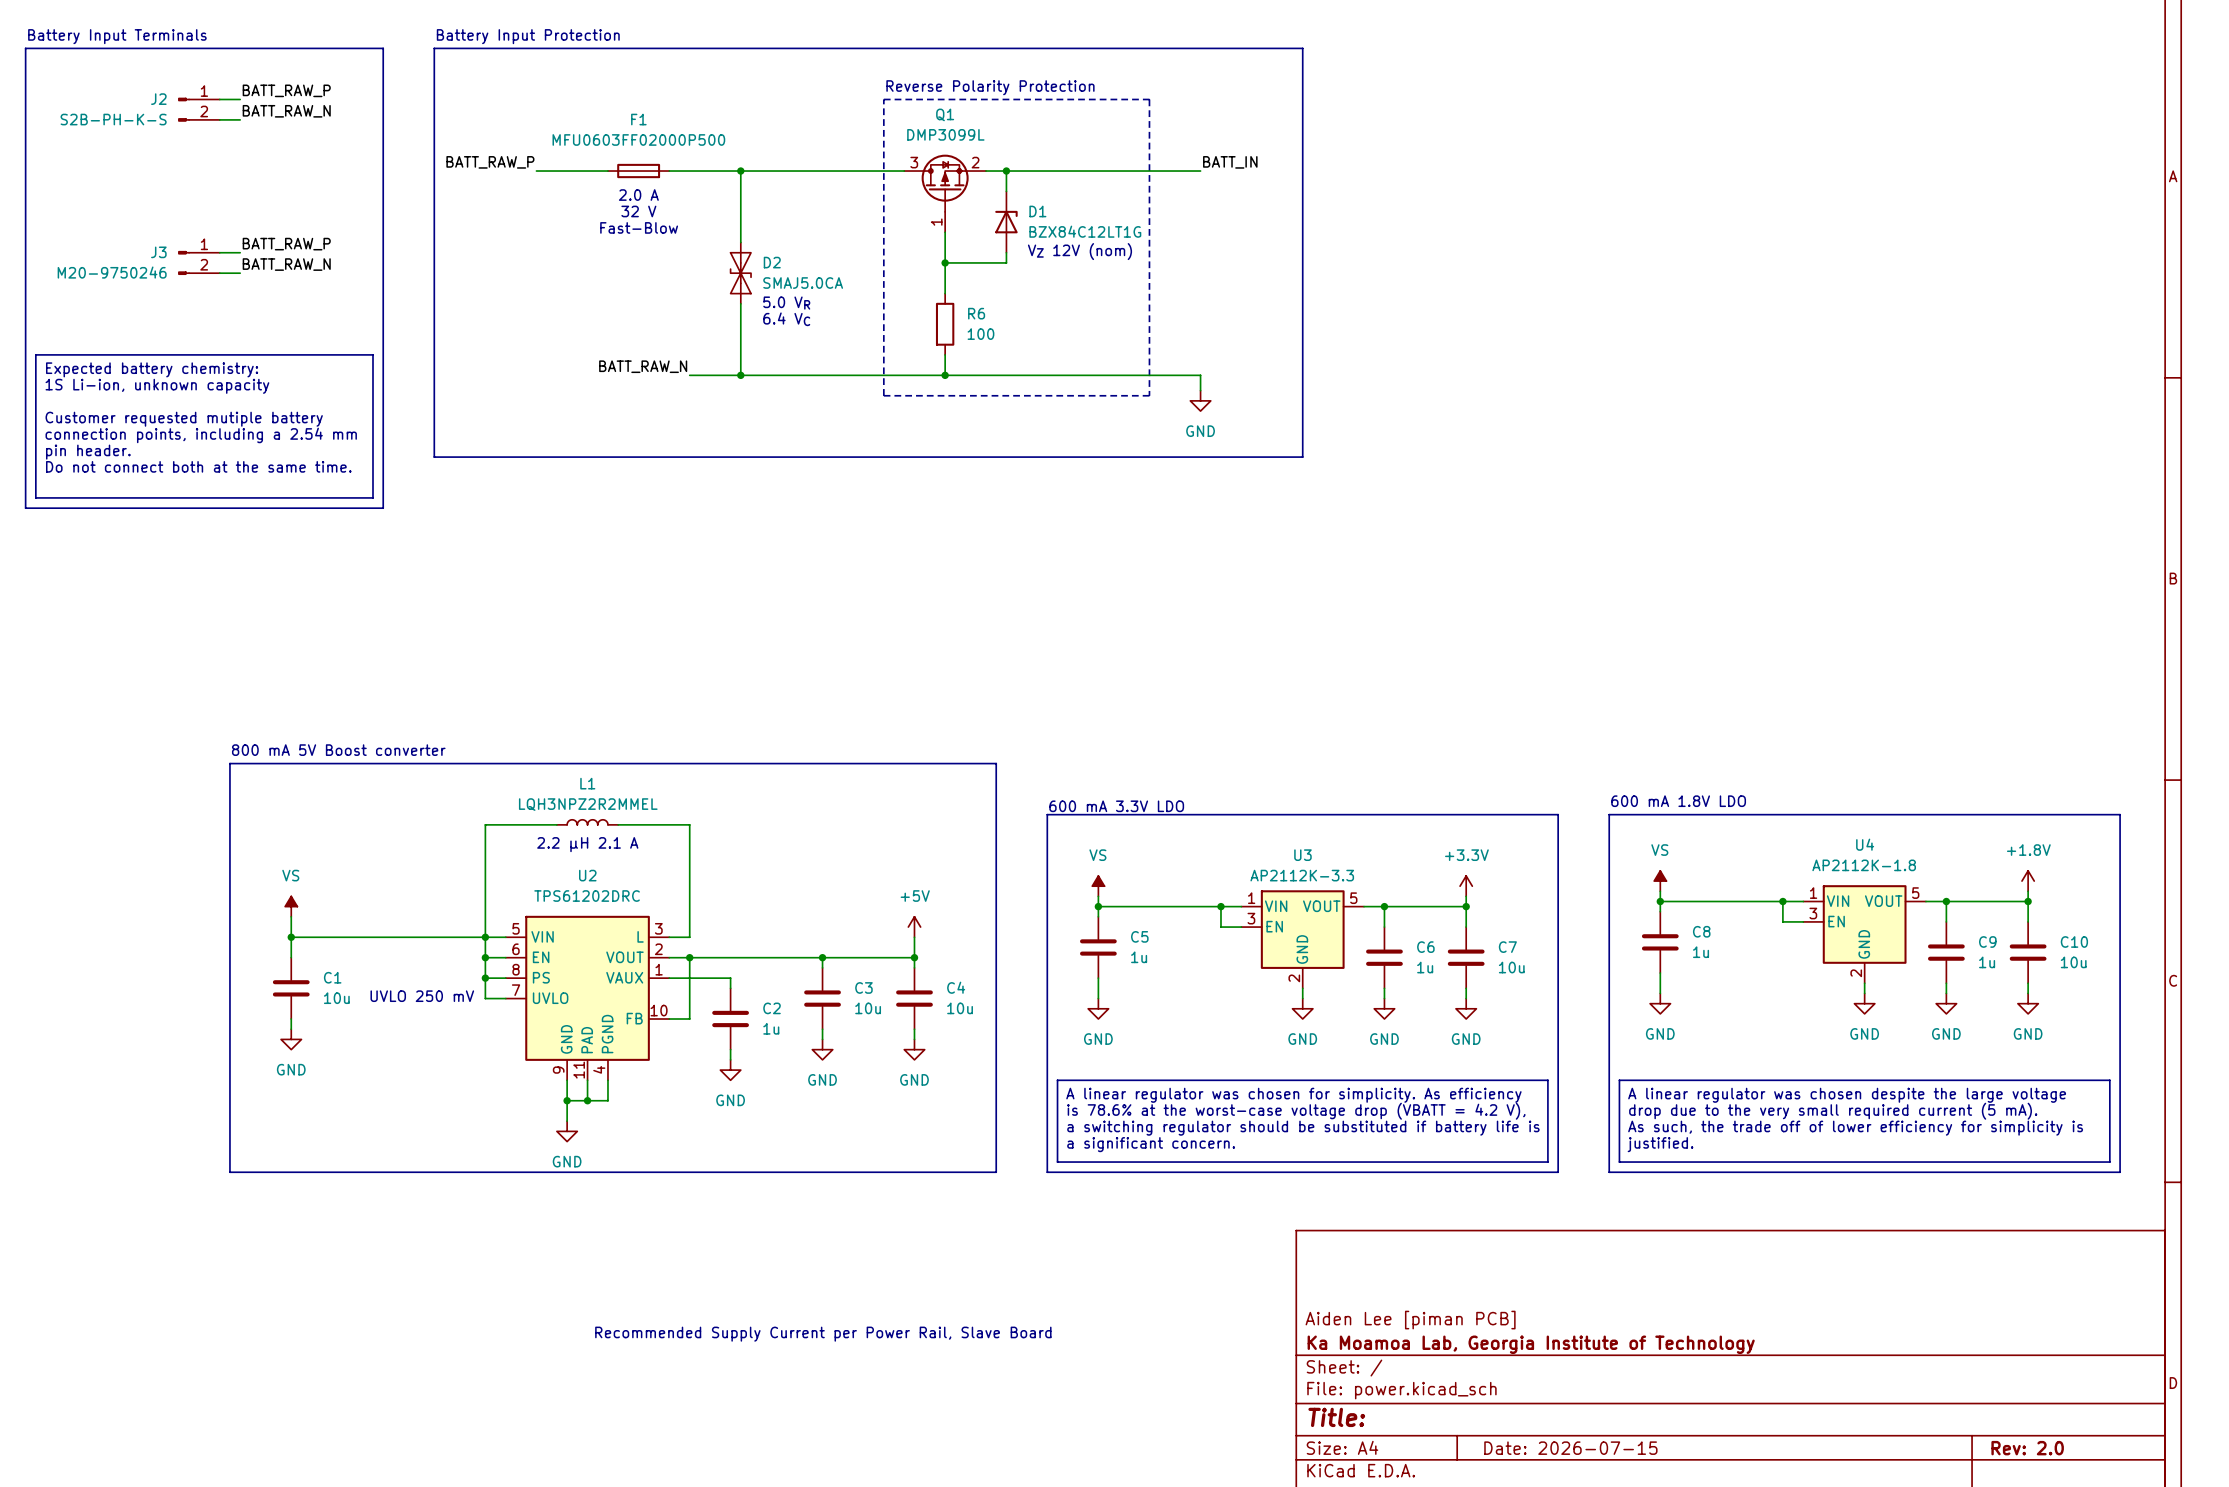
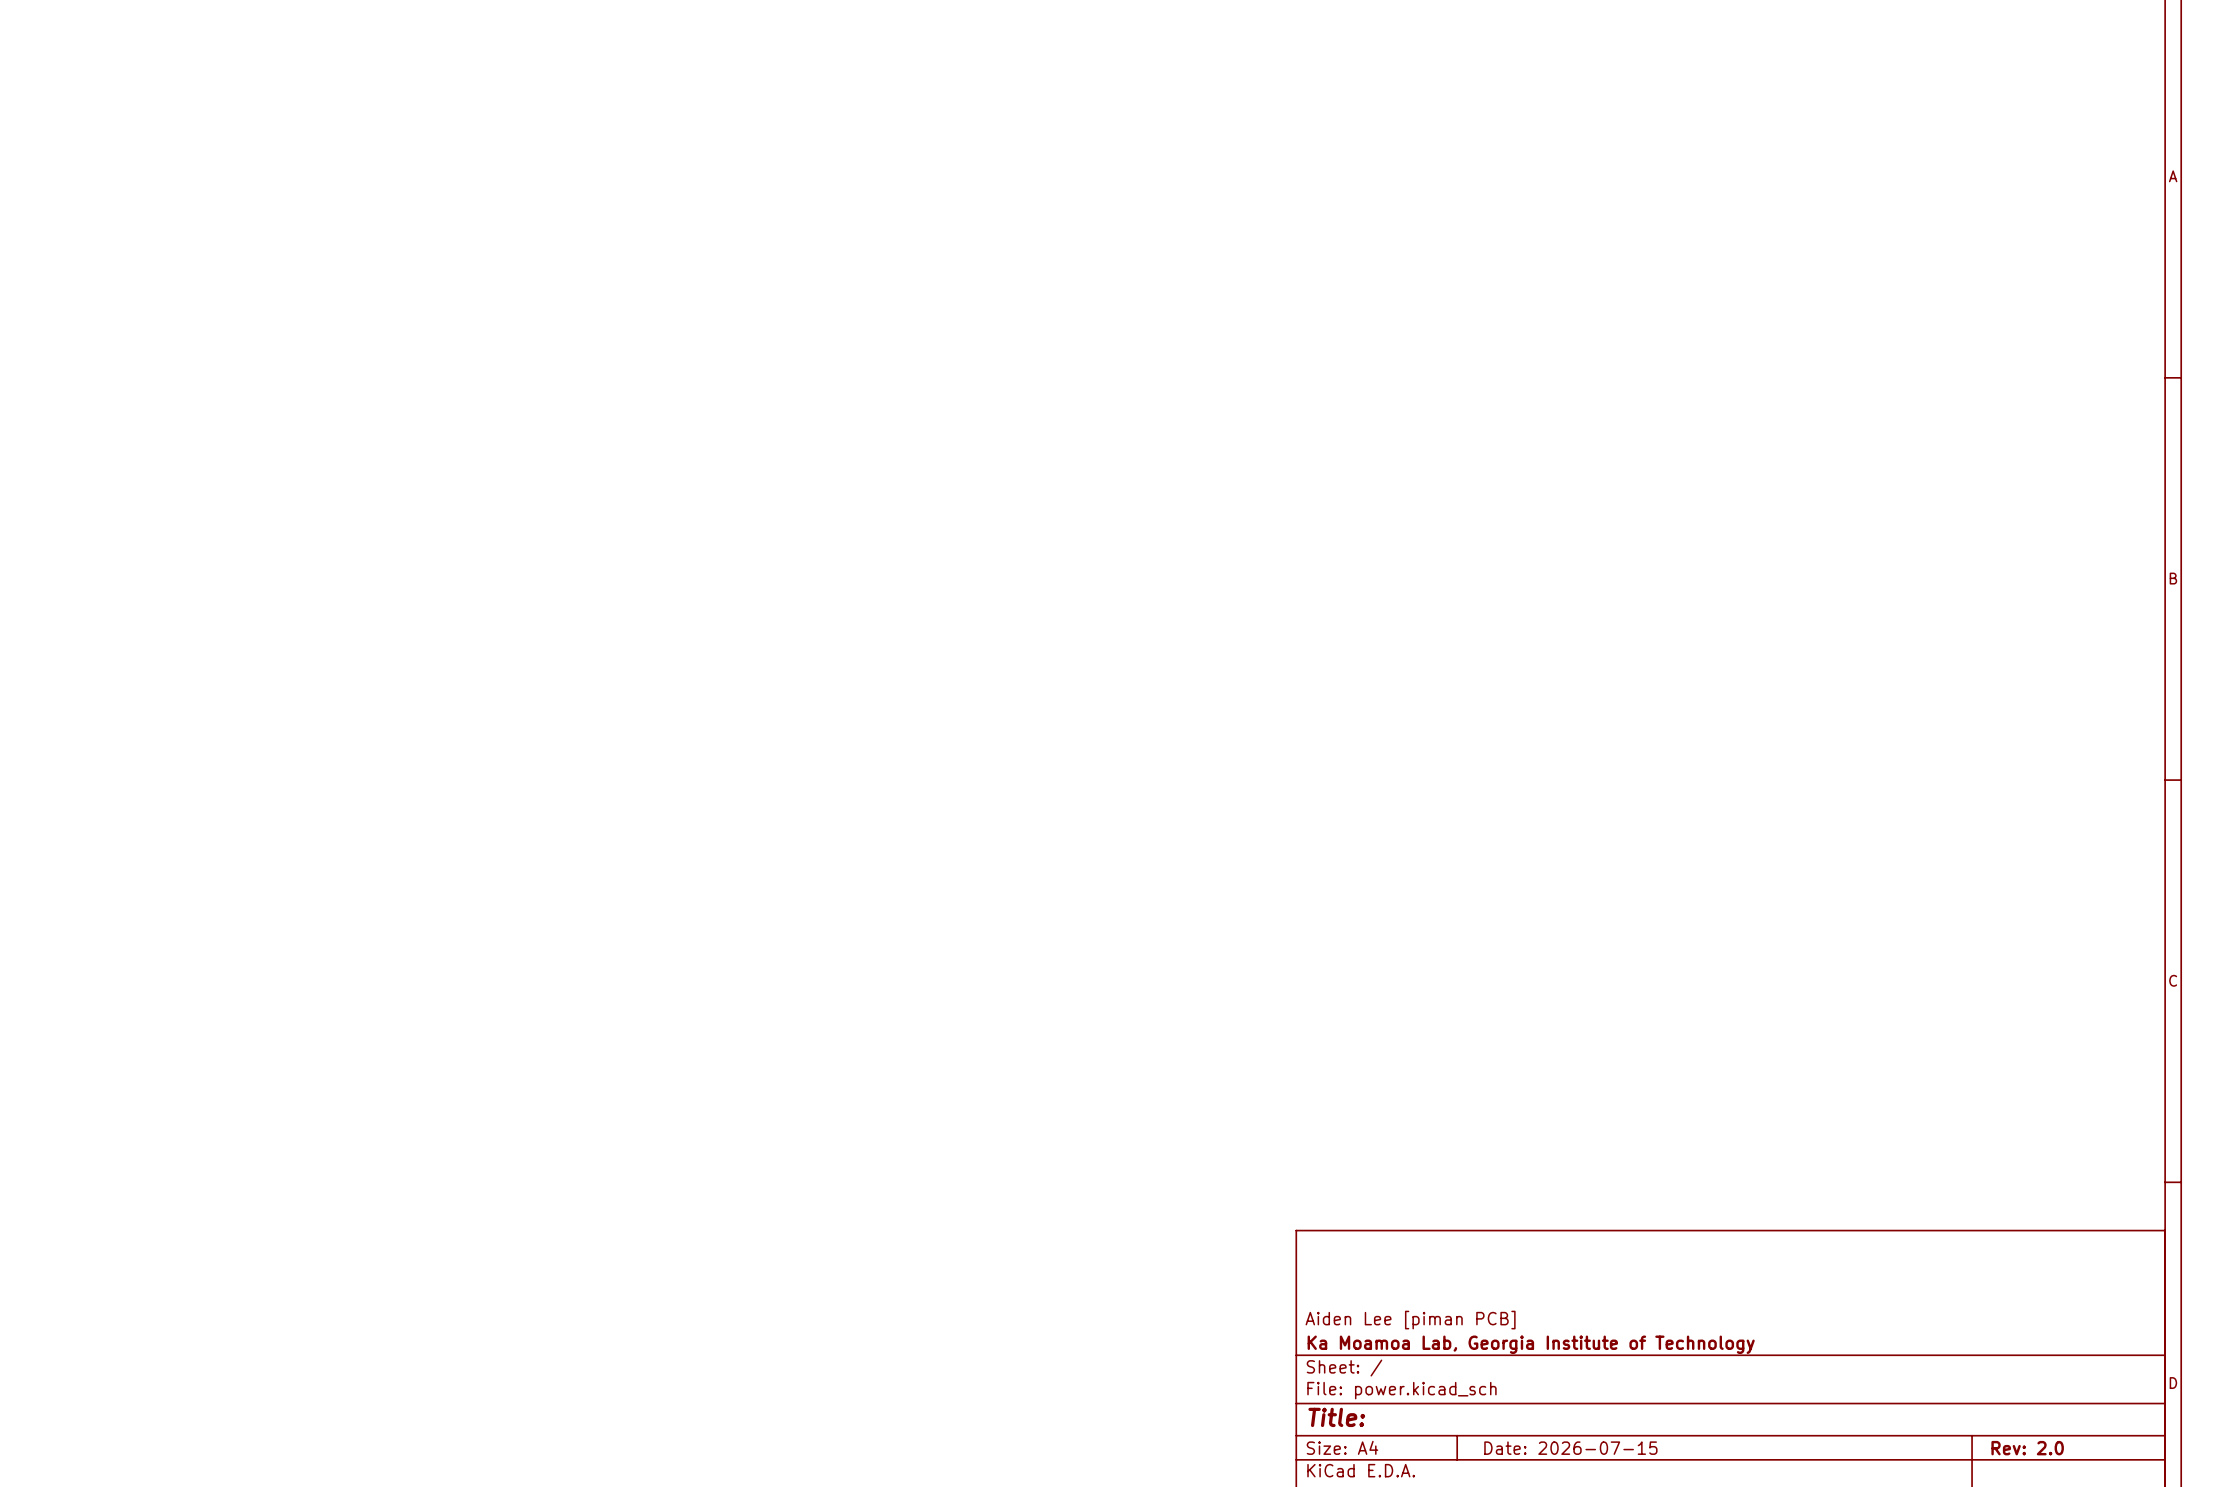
text: Battery Input Terminals (117, 36) -> none
text: Battery Input Protection (528, 36) -> none
line: (25, 48) (383, 48) (383, 508) (25, 508) (25, 48) -> none
line: (434, 48) (1302, 48) (1302, 457) (434, 457) (434, 48) -> none
text: Reverse Polarity Protection (990, 87) -> none
label: BATT_RAW_P (286, 90) -> none
wire: (219, 99) (240, 99) -> none
line: (883, 99) (1149, 99) (1149, 395) (883, 395) (883, 99) -> none
J2: S2B-PH-K-S (199, 109) -> none
label: BATT_RAW_N (286, 111) -> none
wire: (219, 119) (240, 119) -> none
label: BATT_RAW_P (490, 162) -> none
label: BATT_IN (1230, 162) -> none
wire: (536, 171) (607, 171) -> none
F1: MFU0603FF02000P500 (638, 171) -> none
wire: (669, 171) (904, 171) -> none
wire: (740, 171) (740, 242) -> none
junction: (740, 171) -> none
wire: (986, 171) (1200, 171) -> none
wire: (1006, 171) (1006, 191) -> none
junction: (1006, 171) -> none
Q1: DMP3099L (945, 193) -> none
text: 2.0 A (638, 195) -> none
text: 32 V (638, 211) -> none
D1: BZX84C12LT1G (1006, 222) -> none
text: Fast-Blow (639, 227) -> none
wire: (945, 232) (945, 293) -> none
label: BATT_RAW_P (286, 244) -> none
text: VZ 12V (nom) (1079, 251) -> none
wire: (219, 252) (240, 252) -> none
wire: (1006, 252) (1006, 262) (945, 262) -> none
J3: M20-9750246 (199, 262) -> none
junction: (945, 262) -> none
label: BATT_RAW_N (286, 264) -> none
wire: (219, 273) (240, 273) -> none
D2: SMAJ5.0CA (740, 273) -> none
wire: (740, 303) (740, 375) -> none
text: 5.0 VR (786, 303) -> none
text: 6.4 VC (786, 319) -> none
R6: 100 (945, 324) -> none
line: (35, 354) (373, 354) (373, 497) (35, 497) (35, 354) -> none
wire: (945, 354) (945, 375) -> none
label: BATT_RAW_N (643, 366) -> none
text: Expected battery chemistry: (152, 369) -> none
wire: (689, 375) (1200, 375) (1200, 390) -> none
junction: (740, 375) -> none
junction: (945, 375) -> none
text: 1S Li-ion, unknown capacity (157, 386) -> none
power symbol: GND (1200, 400) -> none
text: Customer requested mutiple battery (184, 419) -> none
text: connection points, including a 2.54 mm (201, 435) -> none
text: pin header. (88, 452) -> none
text: Do not connect both at the same time. (198, 466) -> none
text: 800 mA 5V Boost converter (338, 750) -> none
line: (229, 763) (996, 763) (996, 1172) (229, 1172) (229, 763) -> none
text: 600 mA 1.8V LDO (1678, 801) -> none
text: 600 mA 3.3V LDO (1116, 806) -> none
line: (1047, 814) (1558, 814) (1558, 1172) (1047, 1172) (1047, 814) -> none
line: (1609, 814) (2120, 814) (2120, 1172) (1609, 1172) (1609, 814) -> none
L1: LQH3NPZ2R2MMEL (587, 822) -> none
wire: (556, 824) (485, 824) (485, 998) (505, 998) -> none
wire: (618, 824) (689, 824) (689, 937) (669, 937) -> none
text: 2.2 µH 2.1 A (587, 844) -> none
power symbol: VS (1660, 881) -> none
power symbol: +1.8V (2028, 881) -> none
power symbol: VS (1098, 886) -> none
power symbol: +3.3V (1466, 886) -> none
wire: (1660, 891) (1660, 911) -> none
wire: (2028, 891) (2028, 921) -> none
wire: (1098, 896) (1098, 916) -> none
wire: (1466, 896) (1466, 927) -> none
wire: (1660, 901) (1803, 901) -> none
junction: (1660, 901) -> none
wire: (1782, 901) (1782, 921) (1803, 921) -> none
junction: (1782, 901) -> none
wire: (1925, 901) (2028, 901) -> none
wire: (1946, 901) (1946, 921) -> none
junction: (1946, 901) -> none
junction: (2028, 901) -> none
power symbol: VS (291, 906) -> none
wire: (1098, 906) (1241, 906) -> none
junction: (1098, 906) -> none
wire: (1220, 906) (1220, 927) (1241, 927) -> none
junction: (1220, 906) -> none
wire: (1364, 906) (1466, 906) -> none
wire: (1384, 906) (1384, 927) -> none
junction: (1384, 906) -> none
junction: (1466, 906) -> none
wire: (291, 916) (291, 957) -> none
power symbol: +5V (914, 927) -> none
U4: AP2112K-1.8 (1864, 934) -> none
wire: (291, 937) (505, 937) -> none
junction: (291, 937) -> none
junction: (485, 937) -> none
wire: (914, 937) (914, 967) -> none
U3: AP2112K-3.3 (1302, 939) -> none
C8: 1u (1660, 942) -> none
C5: 1u (1098, 947) -> none
C9: 1u (1946, 952) -> none
C10: 10u (2028, 952) -> none
wire: (485, 957) (505, 957) -> none
junction: (485, 957) -> none
wire: (669, 957) (914, 957) -> none
wire: (689, 957) (689, 1019) (669, 1019) -> none
junction: (689, 957) -> none
wire: (822, 957) (822, 967) -> none
junction: (822, 957) -> none
junction: (914, 957) -> none
C6: 1u (1384, 957) -> none
C7: 10u (1466, 957) -> none
wire: (1660, 973) (1660, 993) -> none
wire: (485, 978) (505, 978) -> none
junction: (485, 978) -> none
wire: (669, 978) (730, 978) (730, 988) -> none
wire: (1098, 978) (1098, 998) -> none
wire: (1864, 983) (1864, 993) -> none
wire: (1946, 983) (1946, 993) -> none
wire: (2028, 983) (2028, 993) -> none
C1: 10u (291, 988) -> none
wire: (1302, 988) (1302, 998) -> none
wire: (1384, 988) (1384, 998) -> none
wire: (1466, 988) (1466, 998) -> none
text: UVLO 250 mV (422, 996) -> none
U2: TPS61202DRC (587, 998) -> none
C3: 10u (822, 998) -> none
C4: 10u (914, 998) -> none
power symbol: GND (1660, 1003) -> none
power symbol: GND (1864, 1003) -> none
power symbol: GND (1946, 1003) -> none
power symbol: GND (2028, 1003) -> none
power symbol: GND (1098, 1008) -> none
power symbol: GND (1302, 1008) -> none
power symbol: GND (1384, 1008) -> none
power symbol: GND (1466, 1008) -> none
wire: (291, 1019) (291, 1029) -> none
C2: 1u (730, 1019) -> none
wire: (822, 1029) (822, 1039) -> none
wire: (914, 1029) (914, 1039) -> none
power symbol: GND (291, 1039) -> none
wire: (730, 1049) (730, 1059) -> none
power symbol: GND (822, 1049) -> none
power symbol: GND (914, 1049) -> none
power symbol: GND (730, 1070) -> none
wire: (567, 1080) (567, 1121) -> none
wire: (587, 1080) (587, 1100) -> none
wire: (607, 1080) (607, 1100) (567, 1100) -> none
line: (1057, 1080) (1547, 1080) (1547, 1162) (1057, 1162) (1057, 1080) -> none
line: (1619, 1080) (2109, 1080) (2109, 1162) (1619, 1162) (1619, 1080) -> none
text: A linear regulator was chosen for simplicity. As efficiency (1293, 1095) -> none
text: A linear regulator was chosen despite the large voltage (1847, 1095) -> none
junction: (567, 1100) -> none
junction: (587, 1100) -> none
text: is 78.6% at the worst-case voltage drop (VBATT = 4.2 V), (1296, 1111) -> none
text: drop due to the very small required current (5 mA). (1833, 1111) -> none
text: a switching regulator should be substituted if battery life is (1303, 1128) -> none
text: As such, the trade off of lower efficiency for simplicity is (1855, 1128) -> none
power symbol: GND (567, 1131) -> none
text: a significant concern. (1151, 1144) -> none
text: justified. (1660, 1144) -> none
text: Recommended Supply Current per Power Rail, Slave Board (823, 1334) -> none

